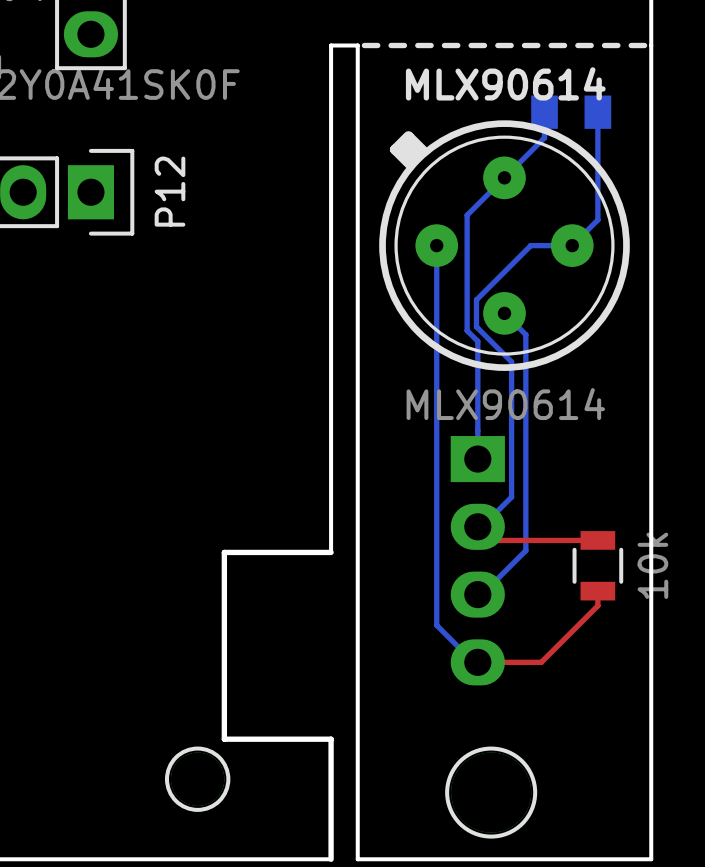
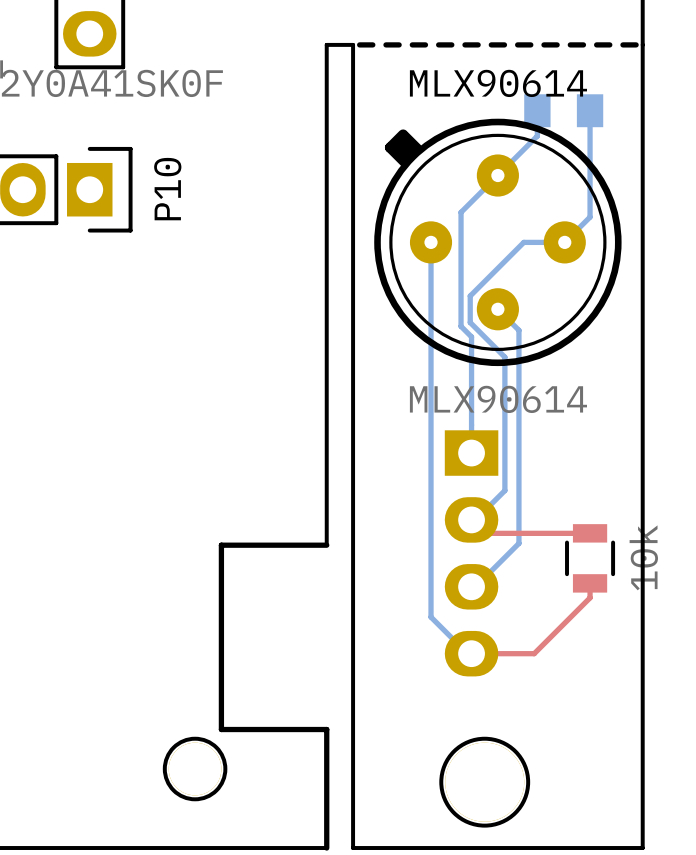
P12 name: P12 (169, 191) -> P10 (167, 189)

